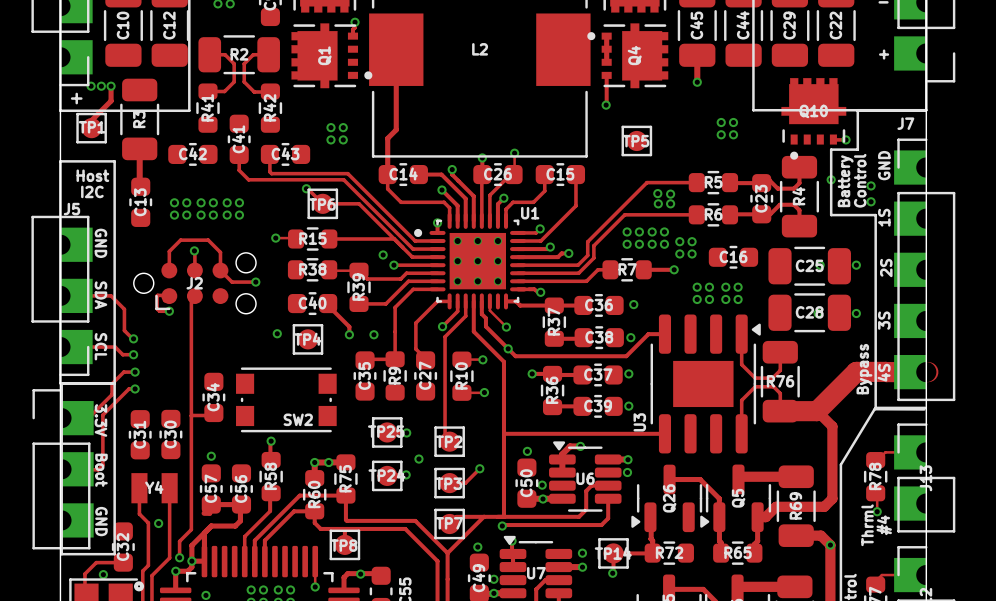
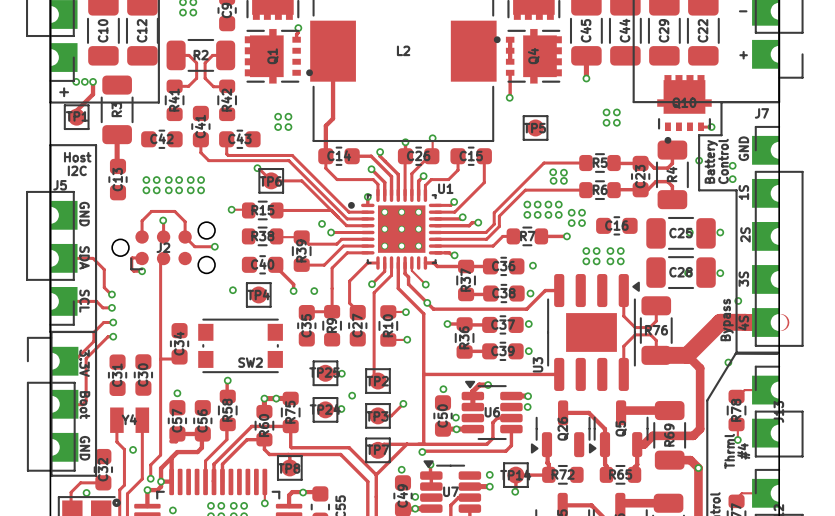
via: none -> (738, 300)
via: none -> (728, 362)

